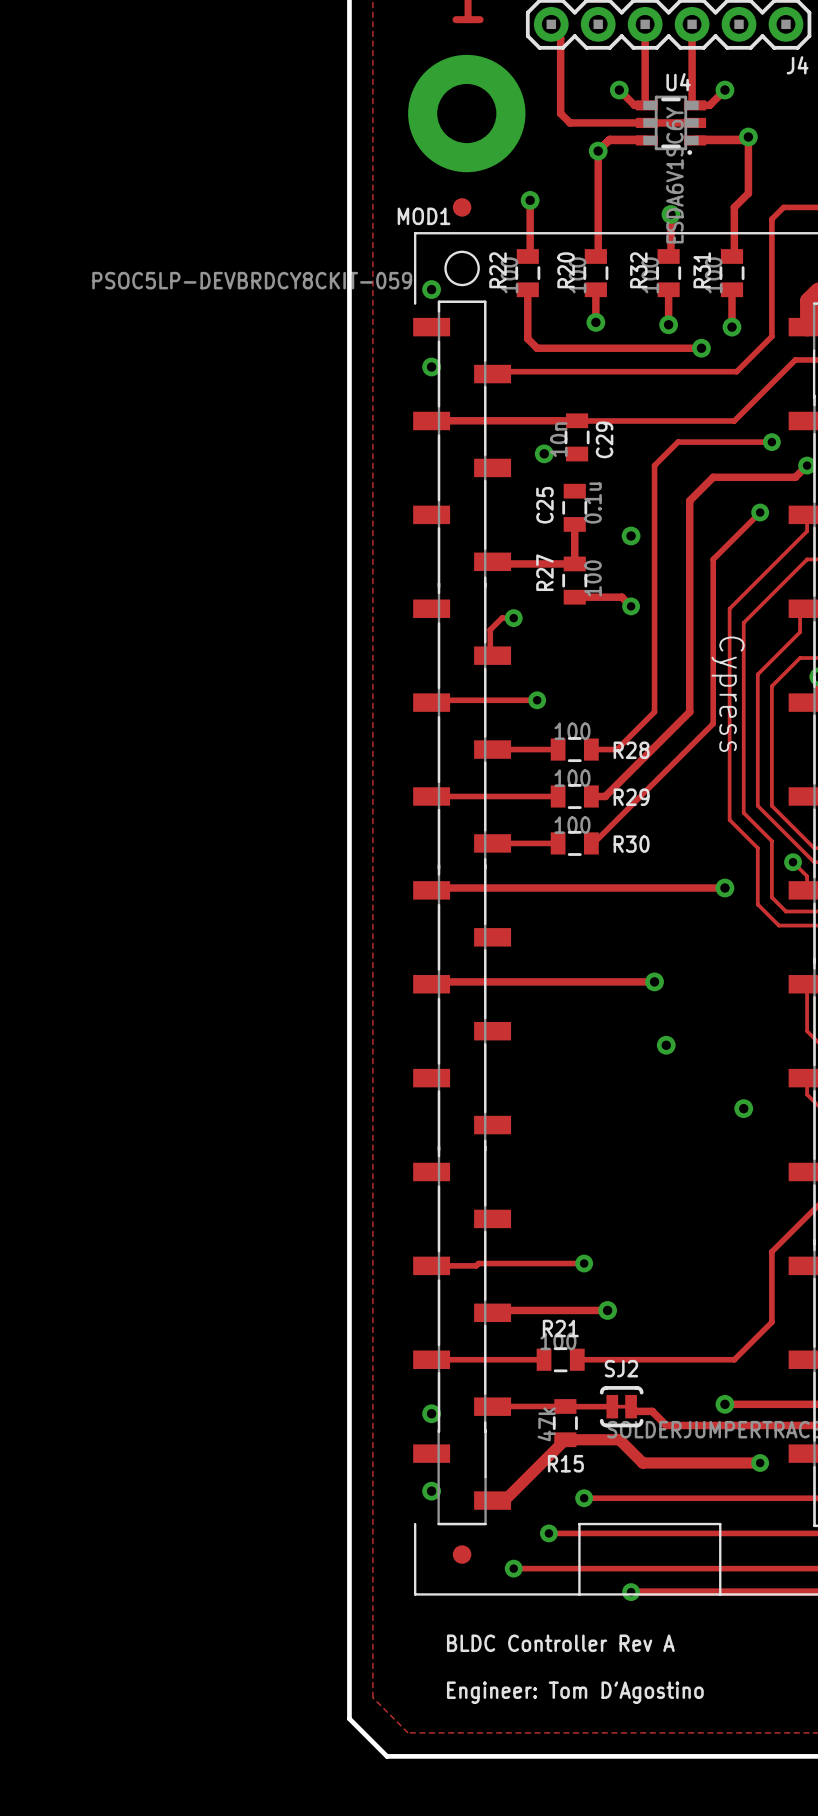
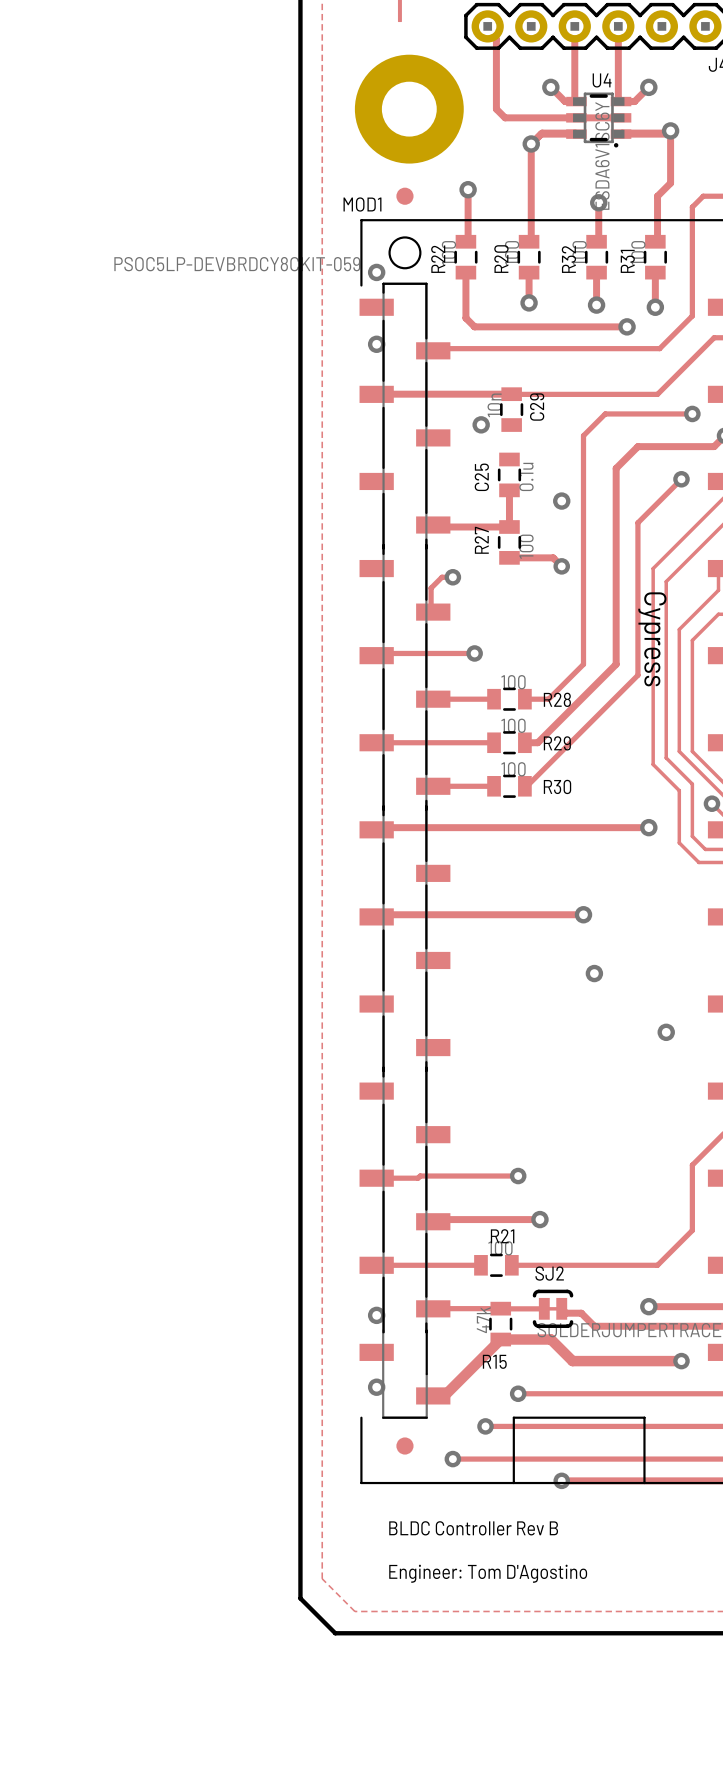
text: BLDC Controller Rev A (560, 1643) -> BLDC Controller Rev B (473, 1528)

